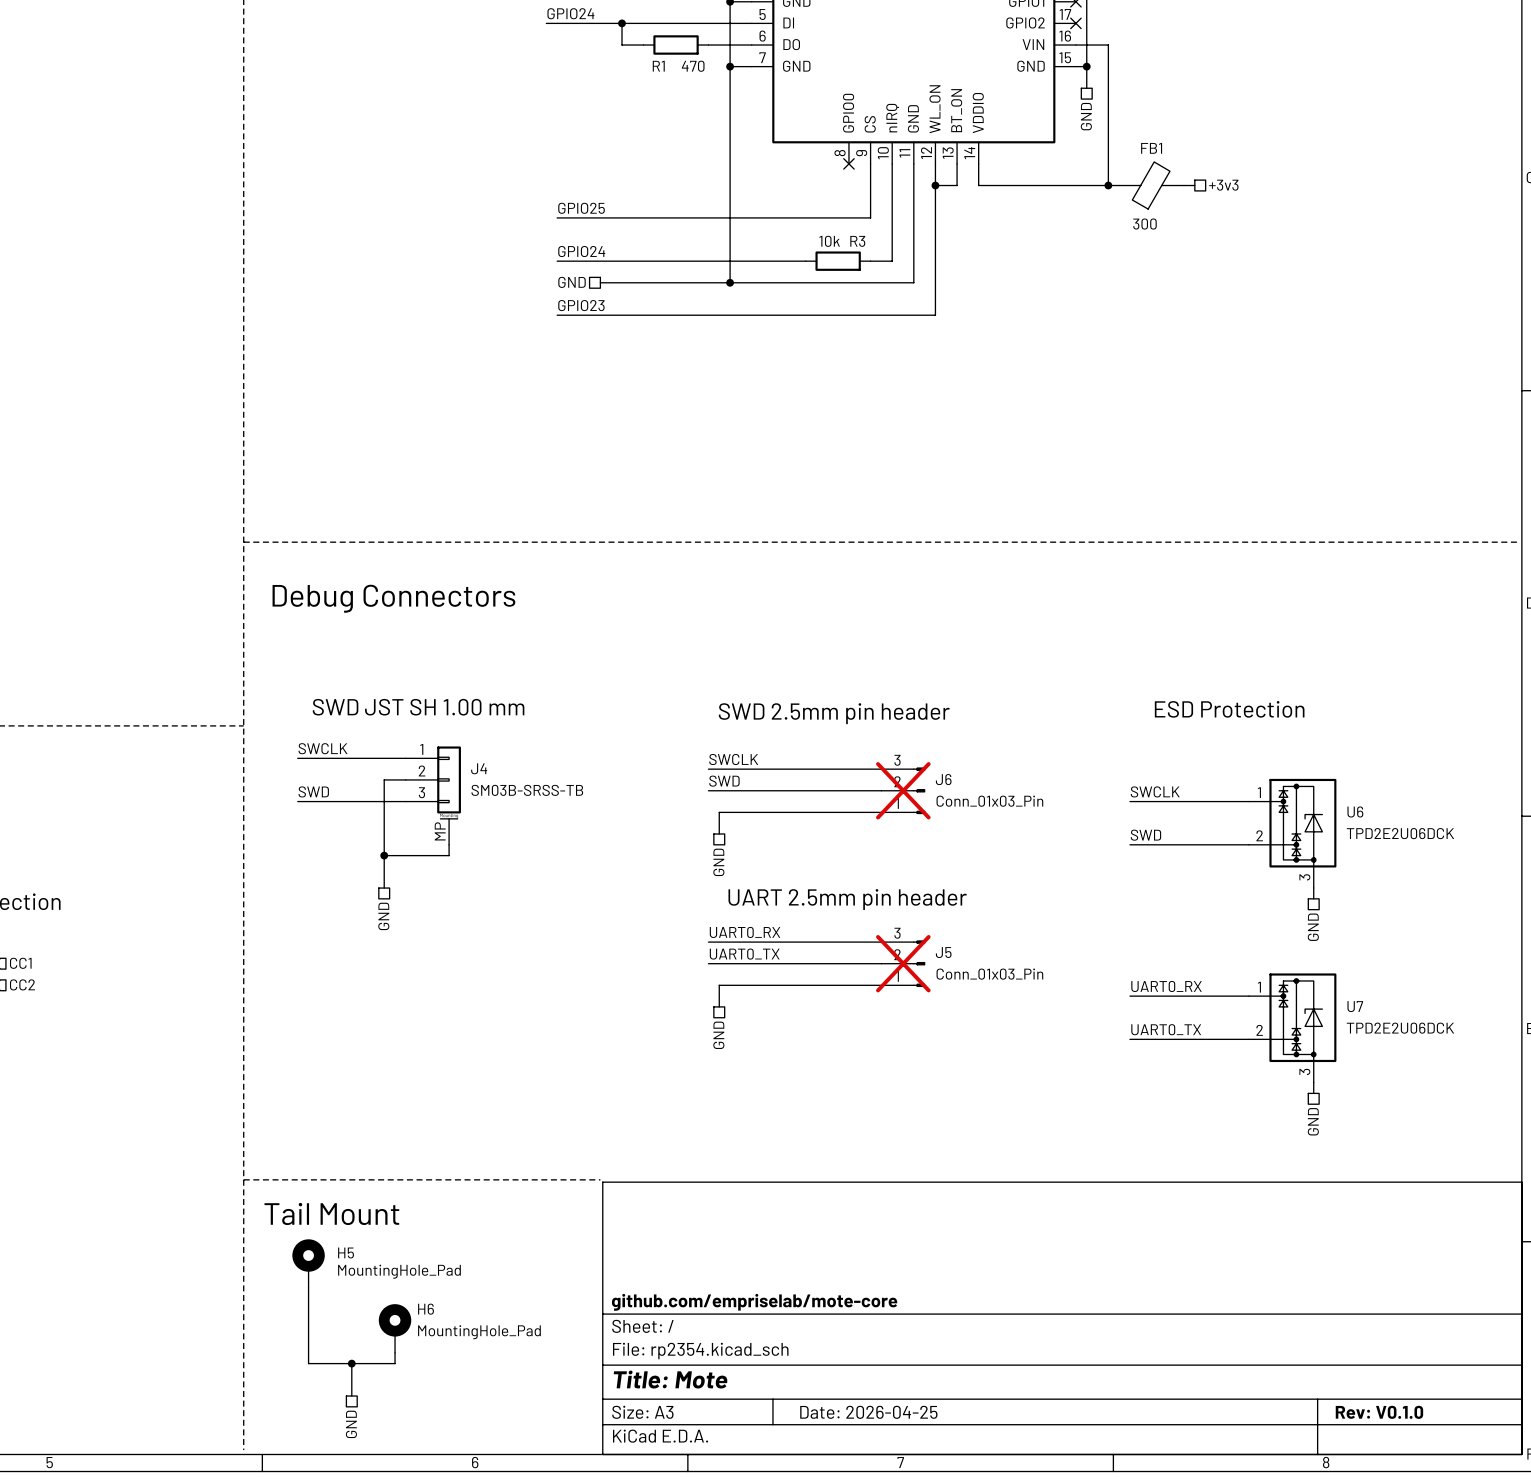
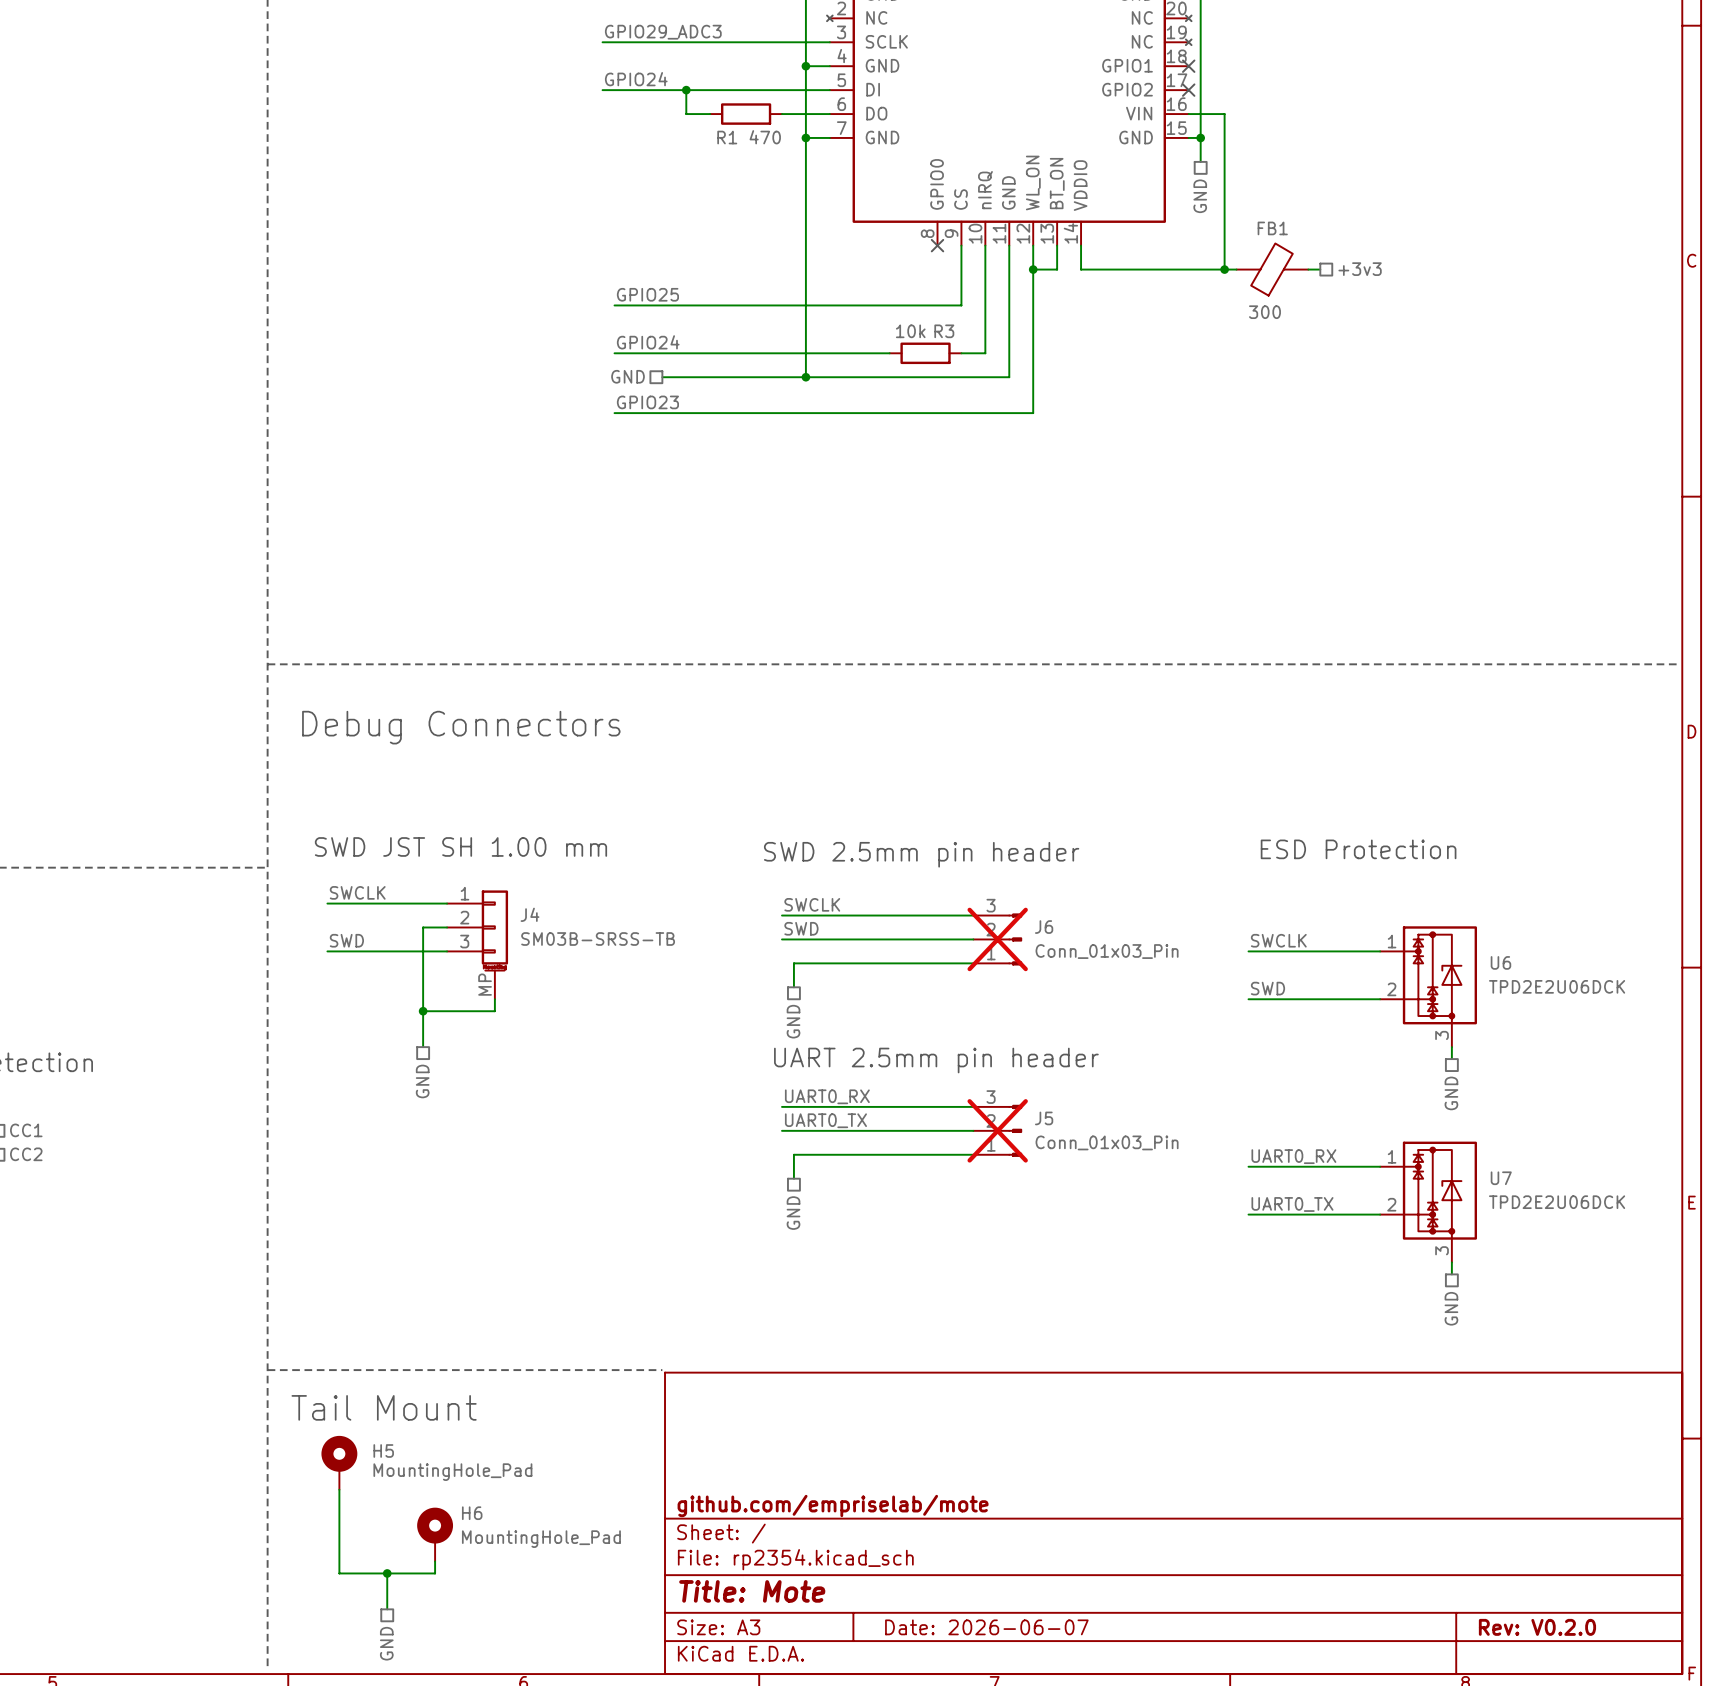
title block: github.com/empriselab/mote-core (754, 1302) -> github.com/empriselab/mote (833, 1505)
title block: Date: 2026-04-25 (868, 1412) -> Date: 2026-06-07 (986, 1627)
title block: Rev: V0.1.0 (1379, 1412) -> Rev: V0.2.0 (1537, 1627)

